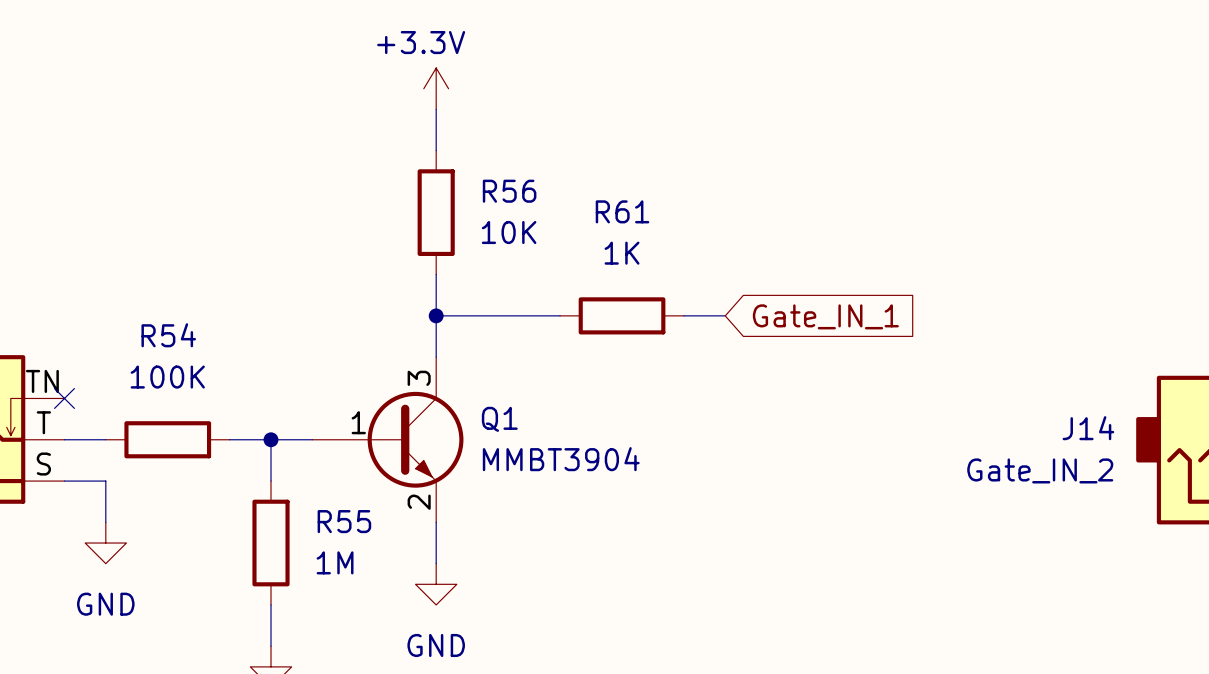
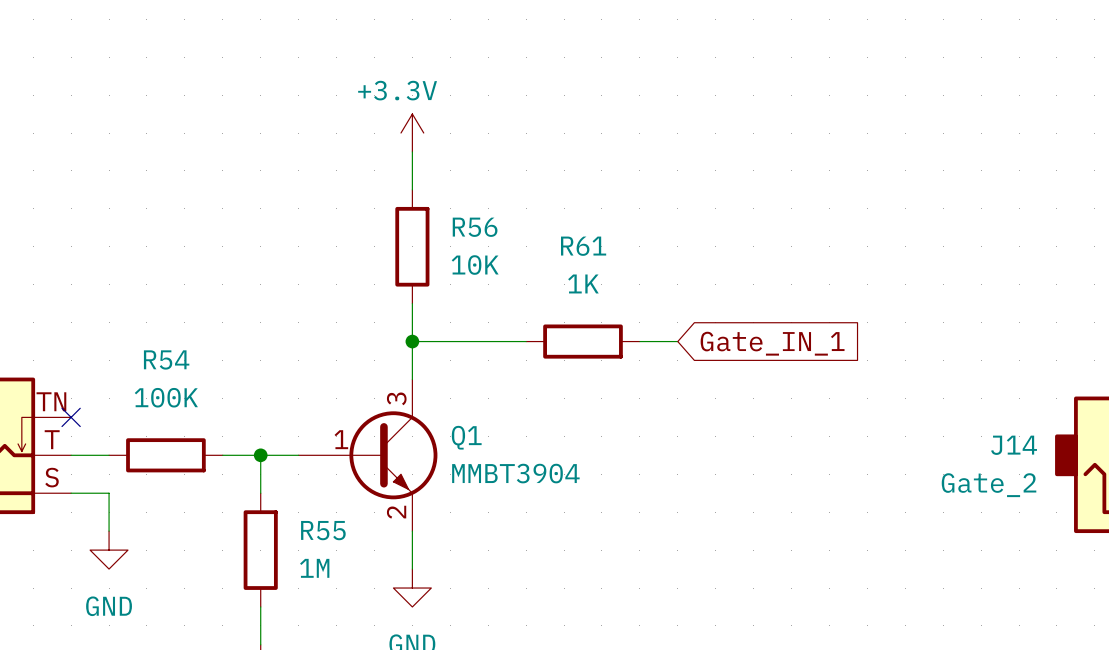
J14 value: Gate_IN_2 (1040, 470) -> Gate_2 (989, 485)

